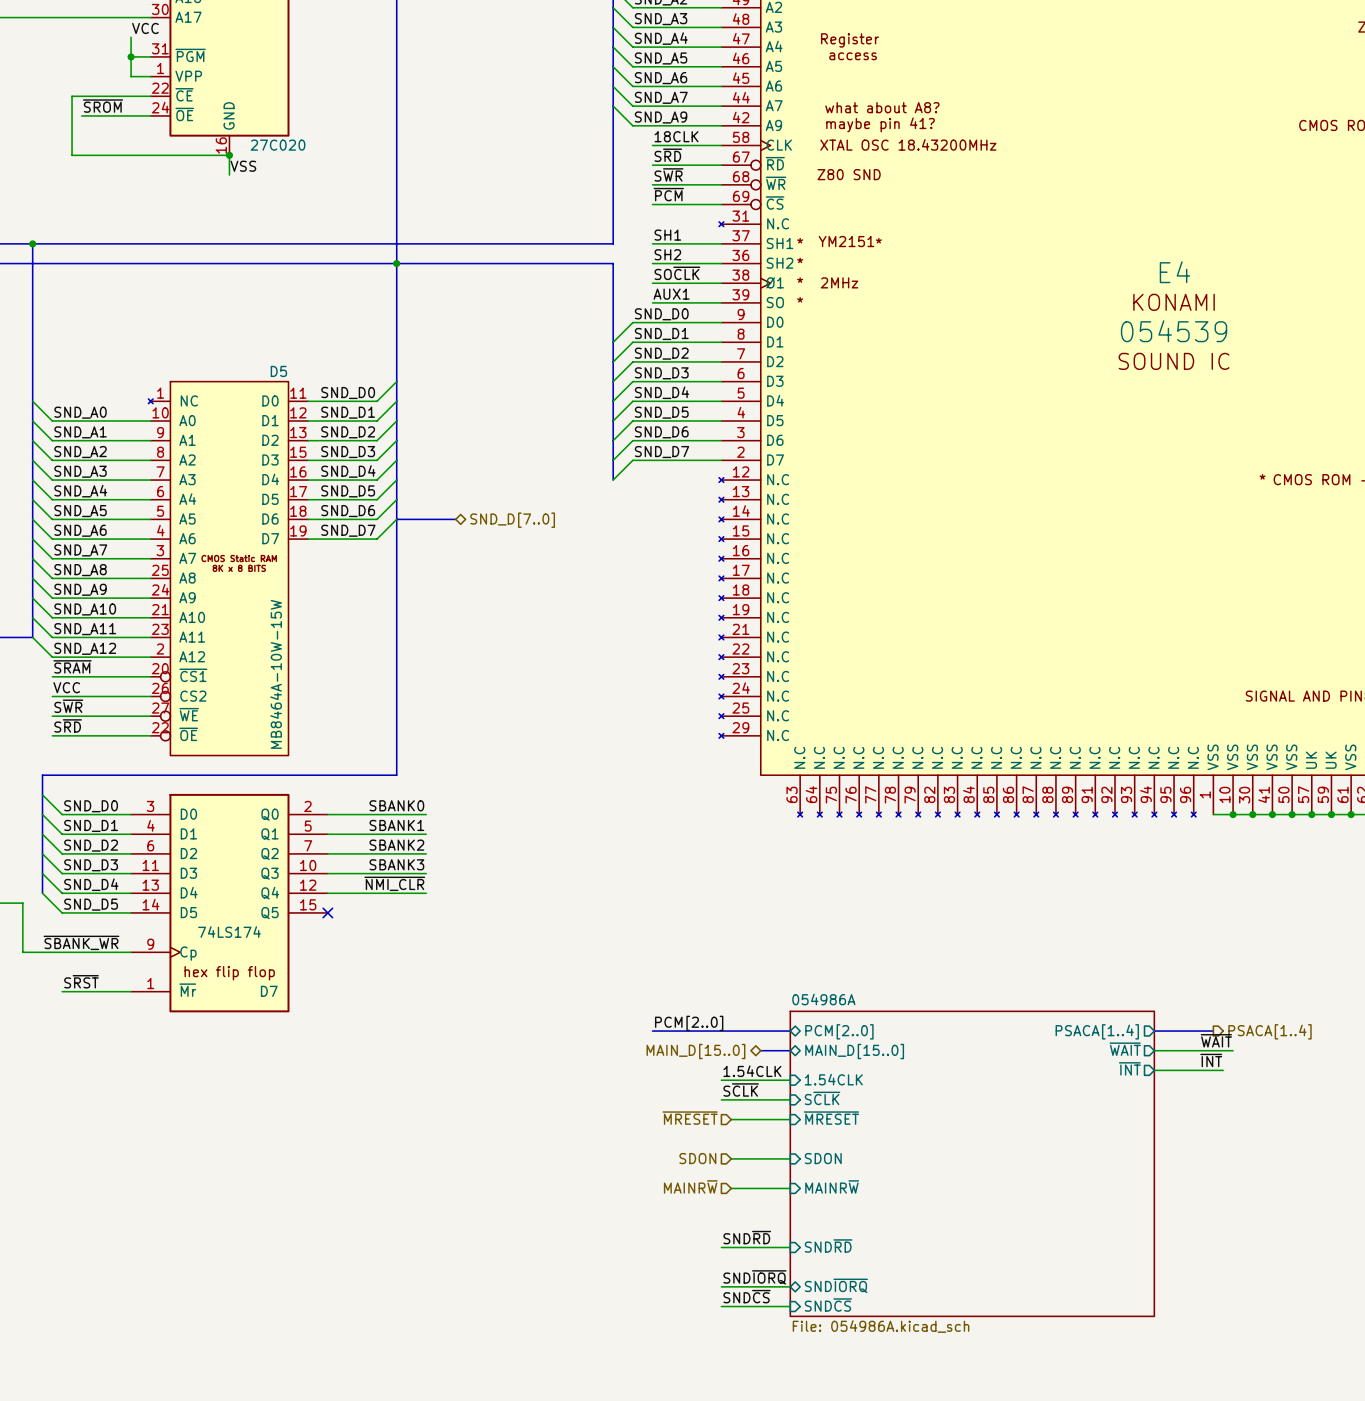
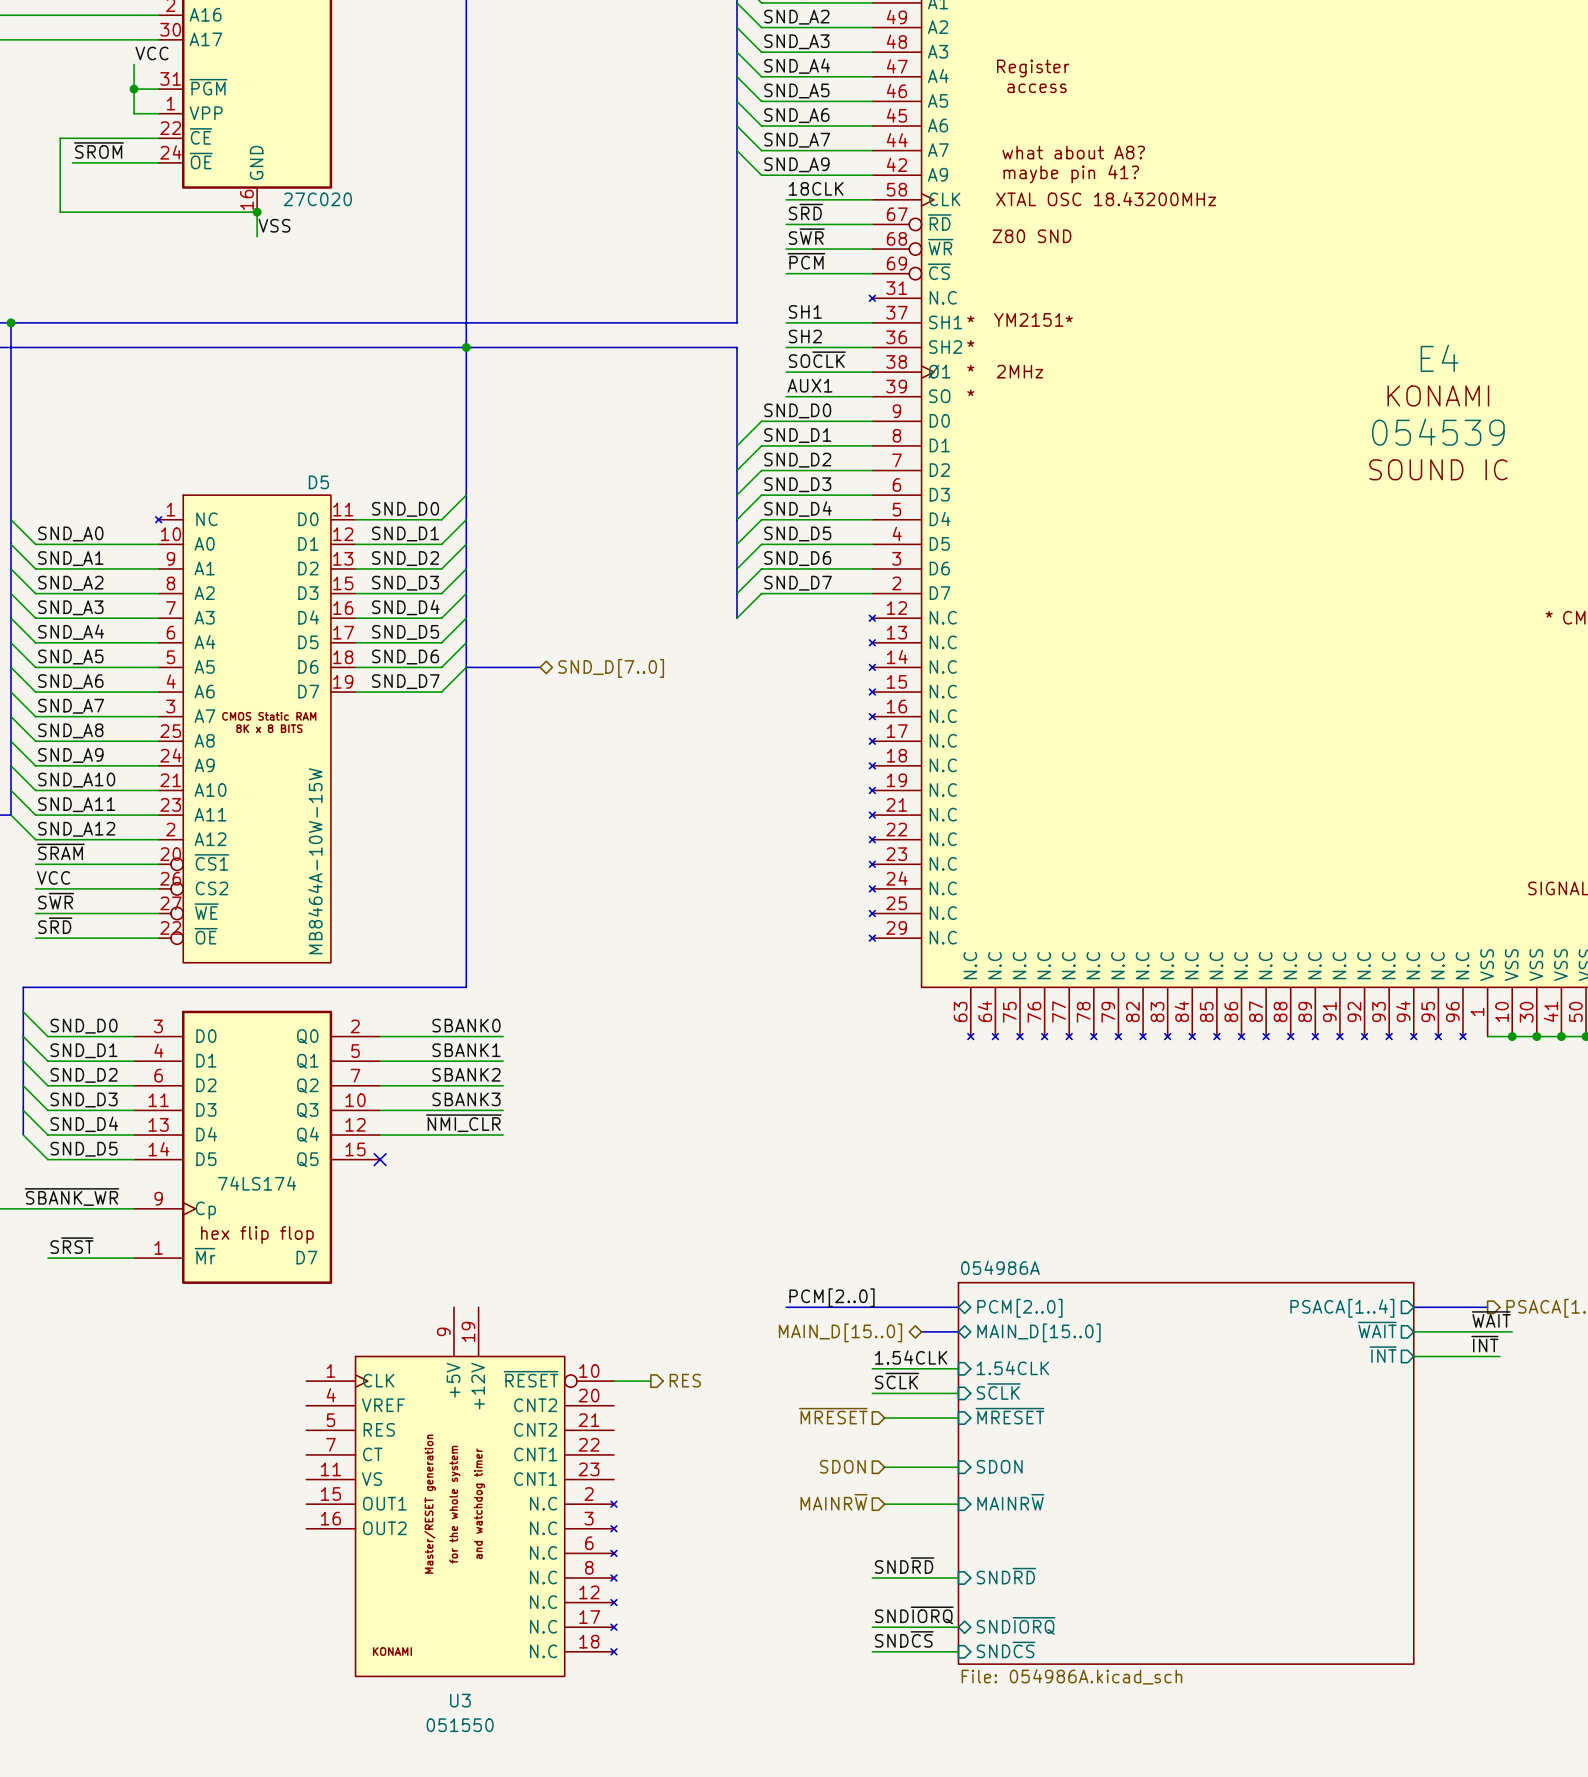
hierarchical label: none -> RES (685, 1380)
wire: none -> (613, 1381) (650, 1381)
U3: none -> 051550 (461, 1492)

